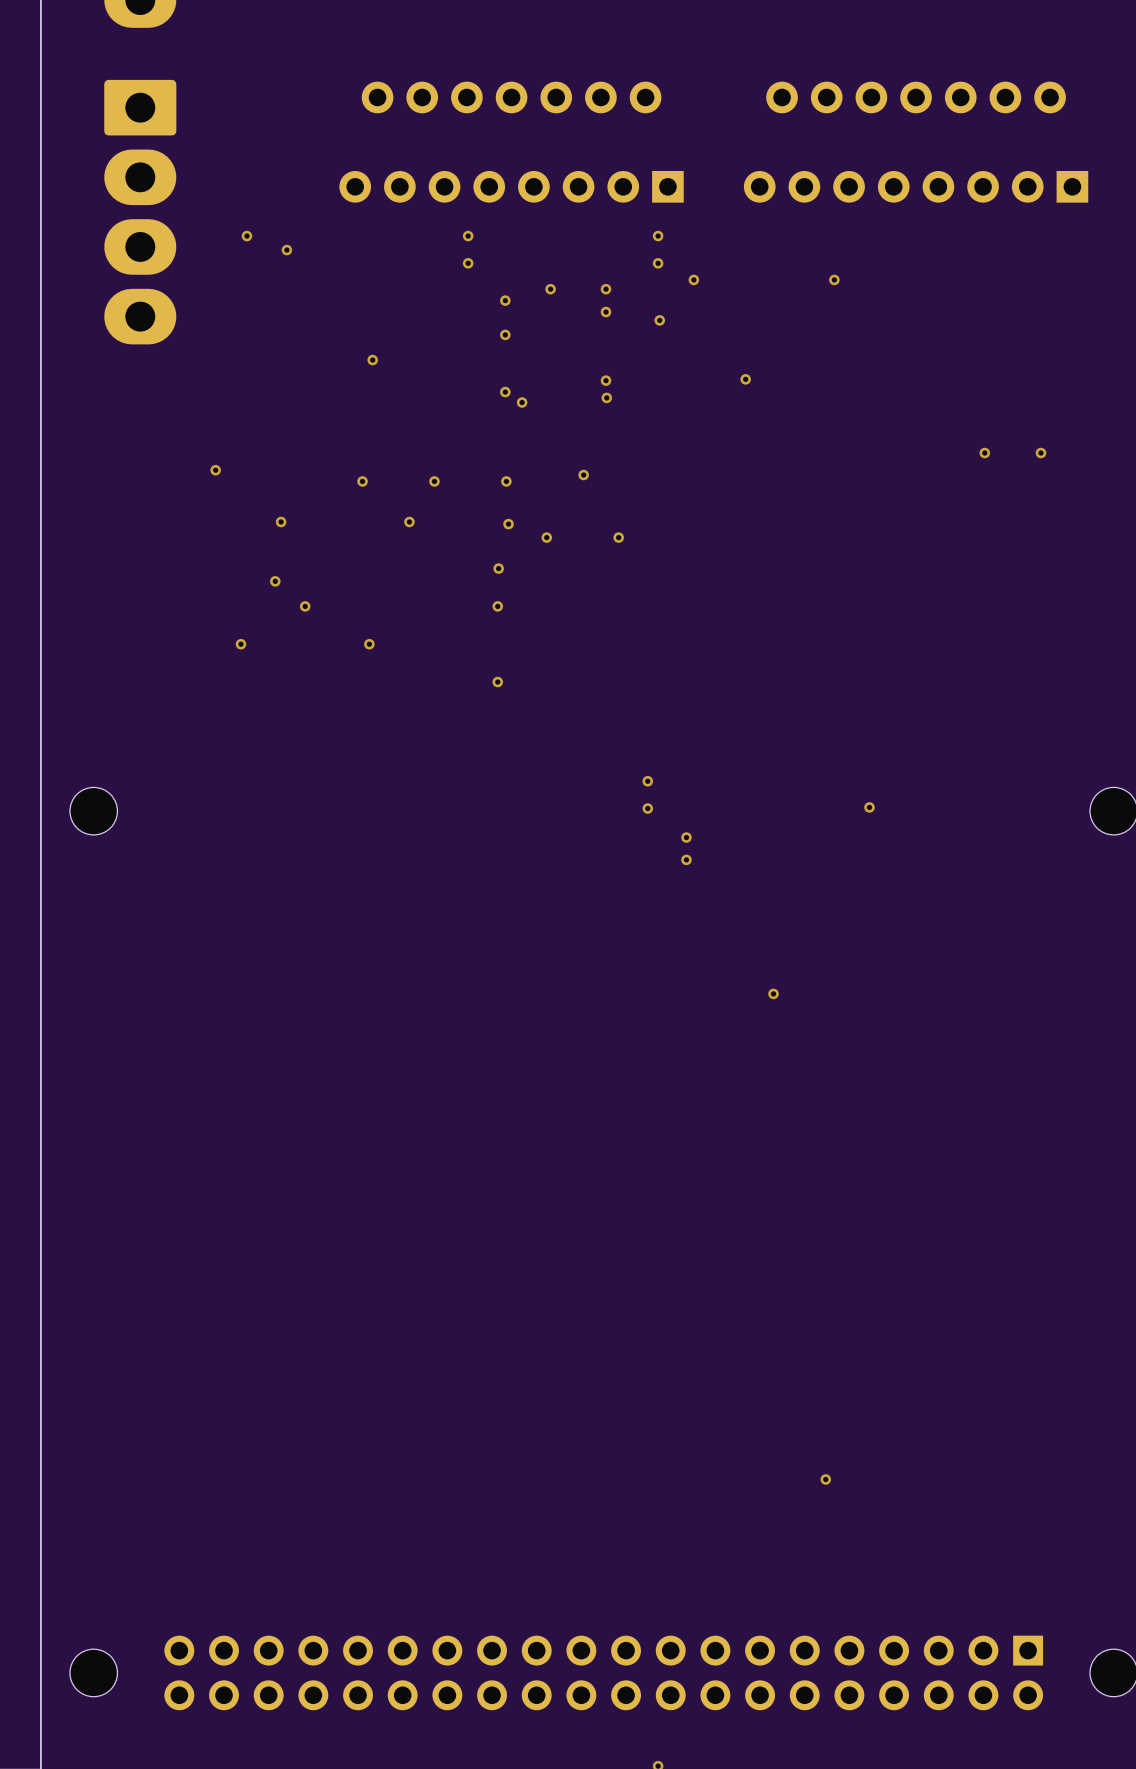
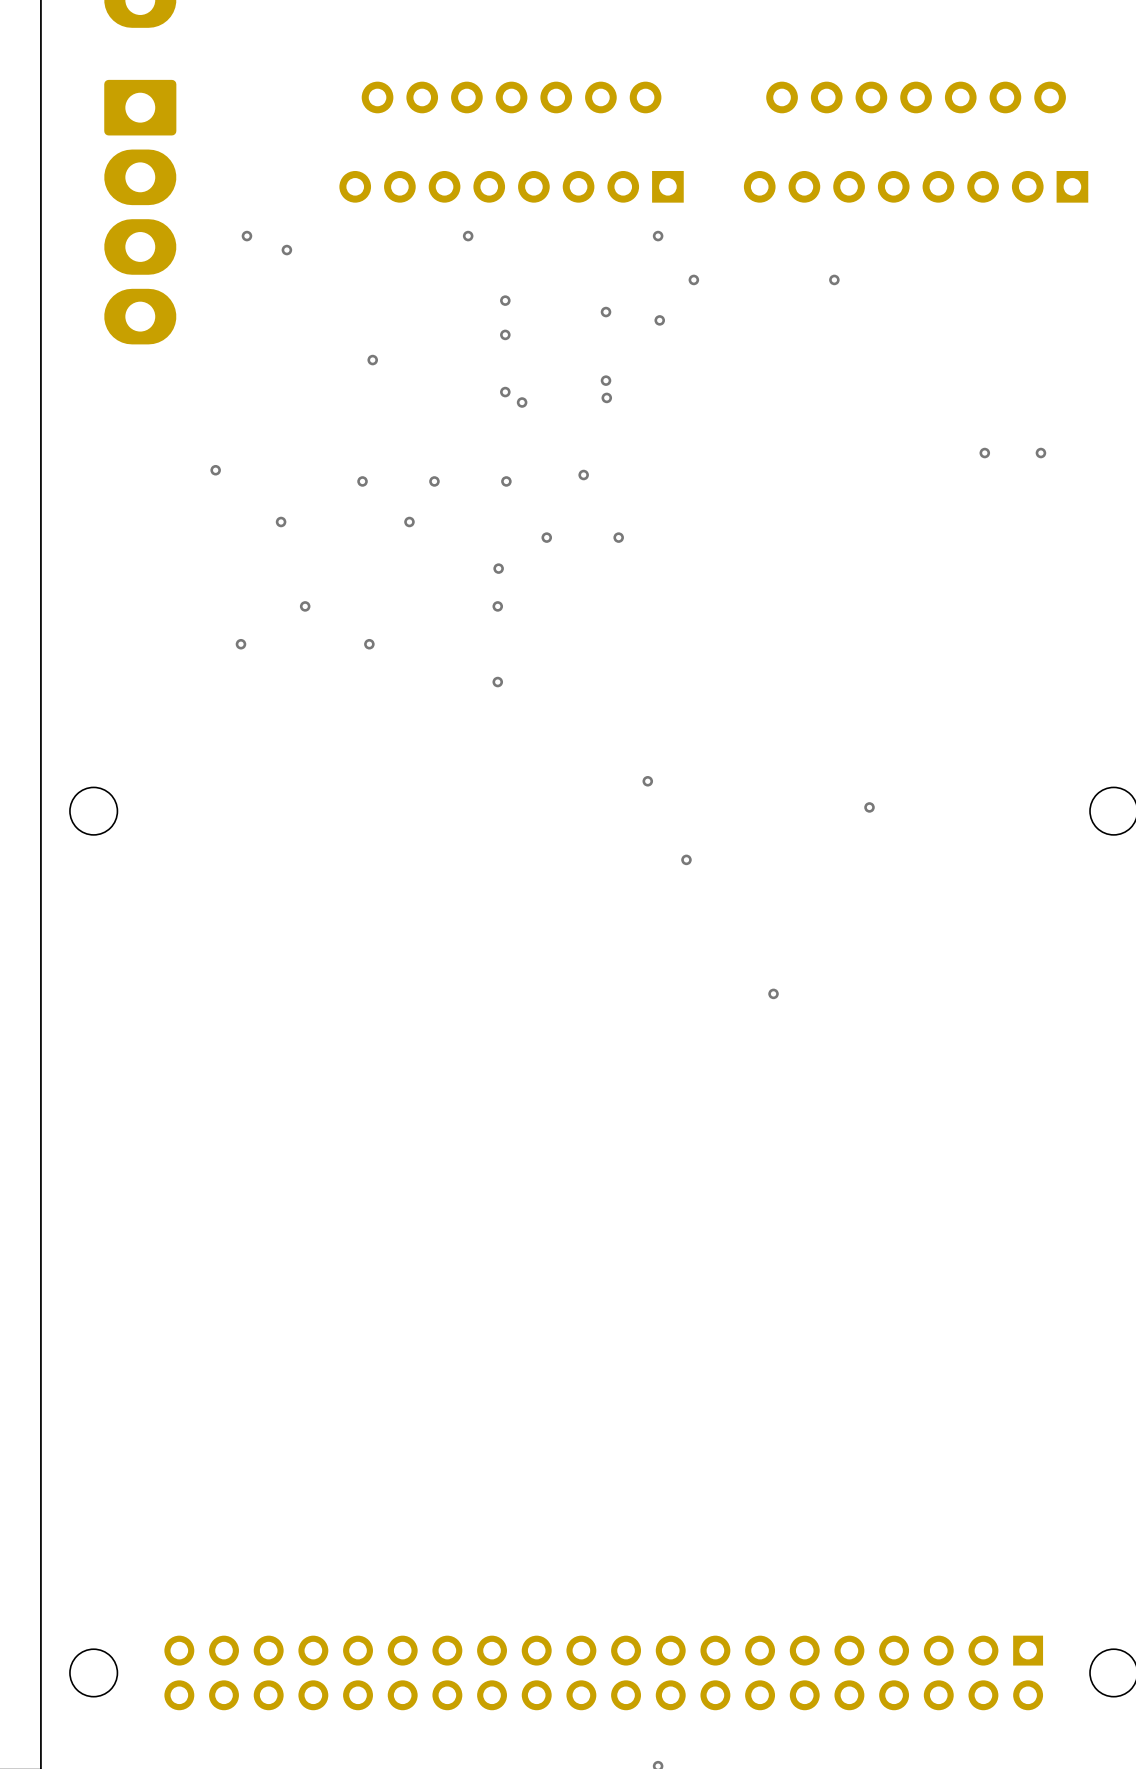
via: (468, 263) -> none
via: (658, 263) -> none
via: (550, 289) -> none
via: (606, 289) -> none
via: (745, 379) -> none
via: (508, 524) -> none
via: (275, 581) -> none
via: (647, 808) -> none
via: (686, 837) -> none
via: (825, 1479) -> none

